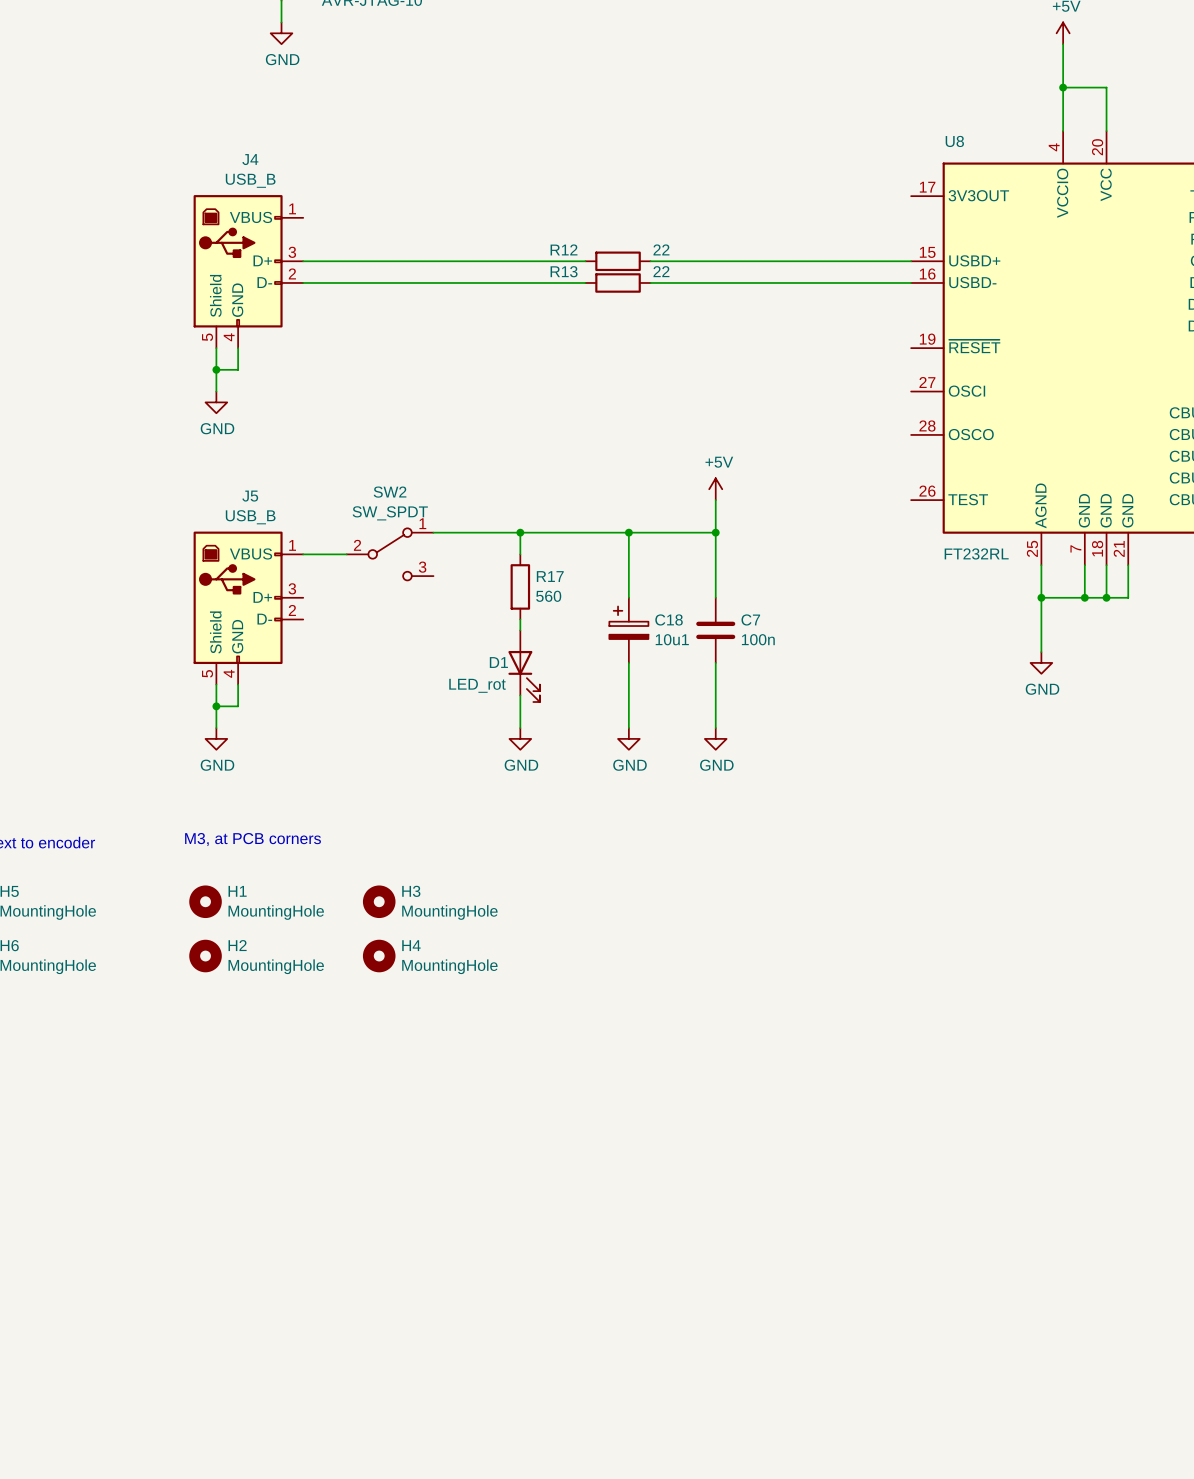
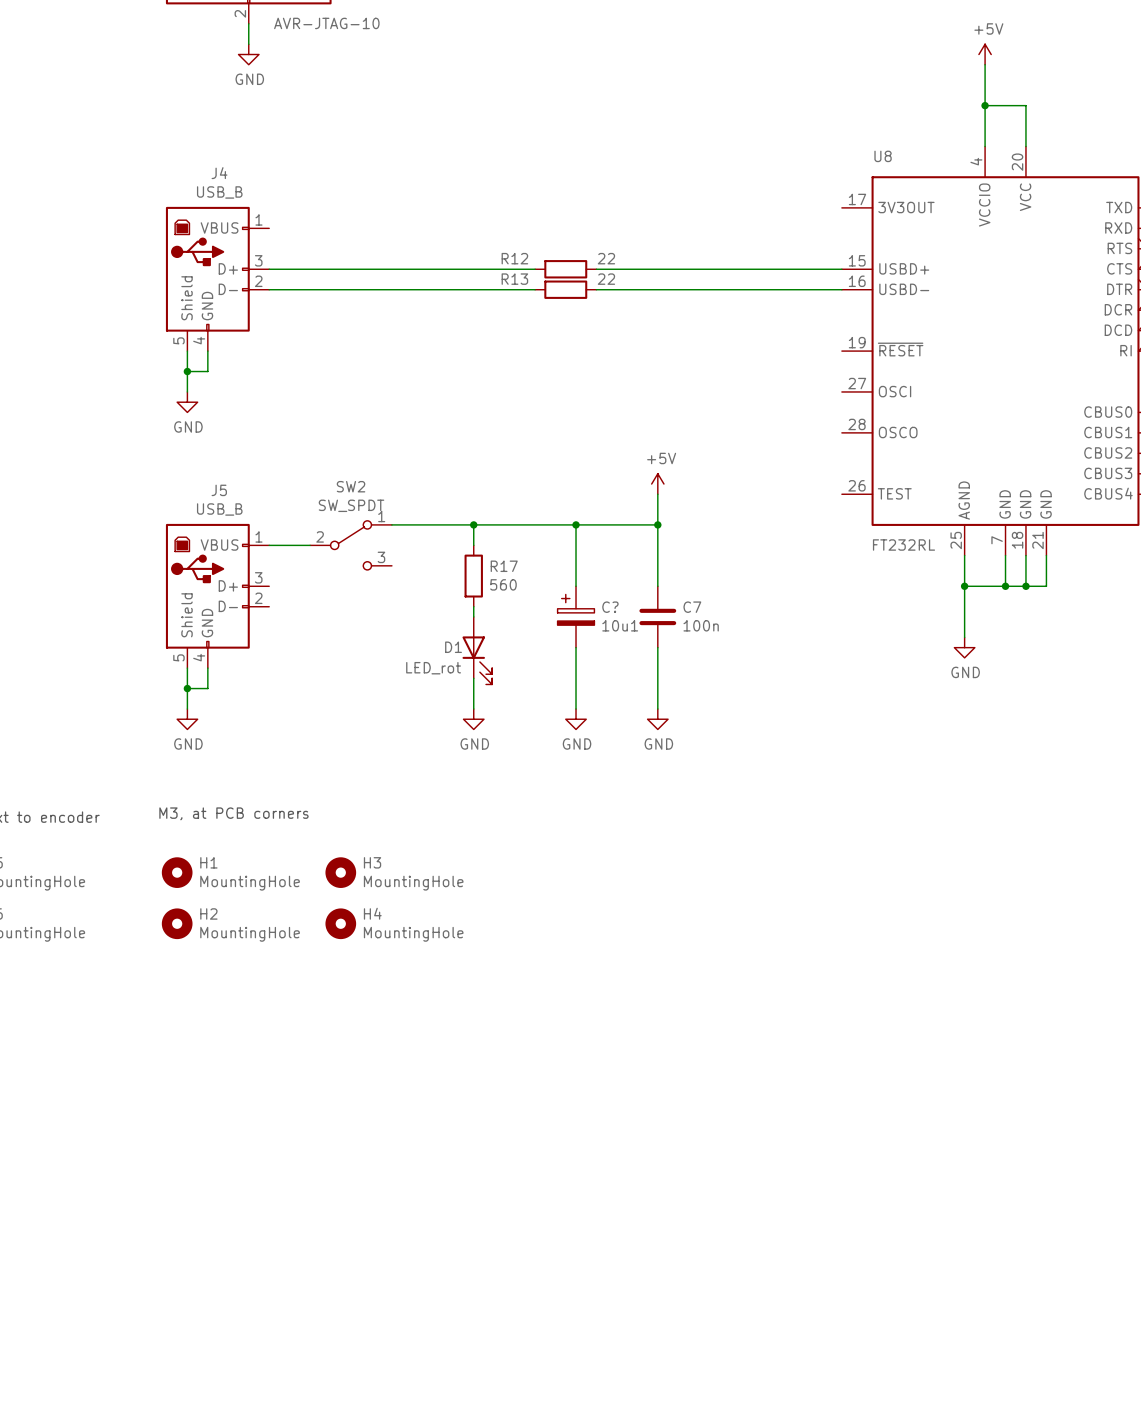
C18 name: C18 (669, 619) -> C? (610, 607)

